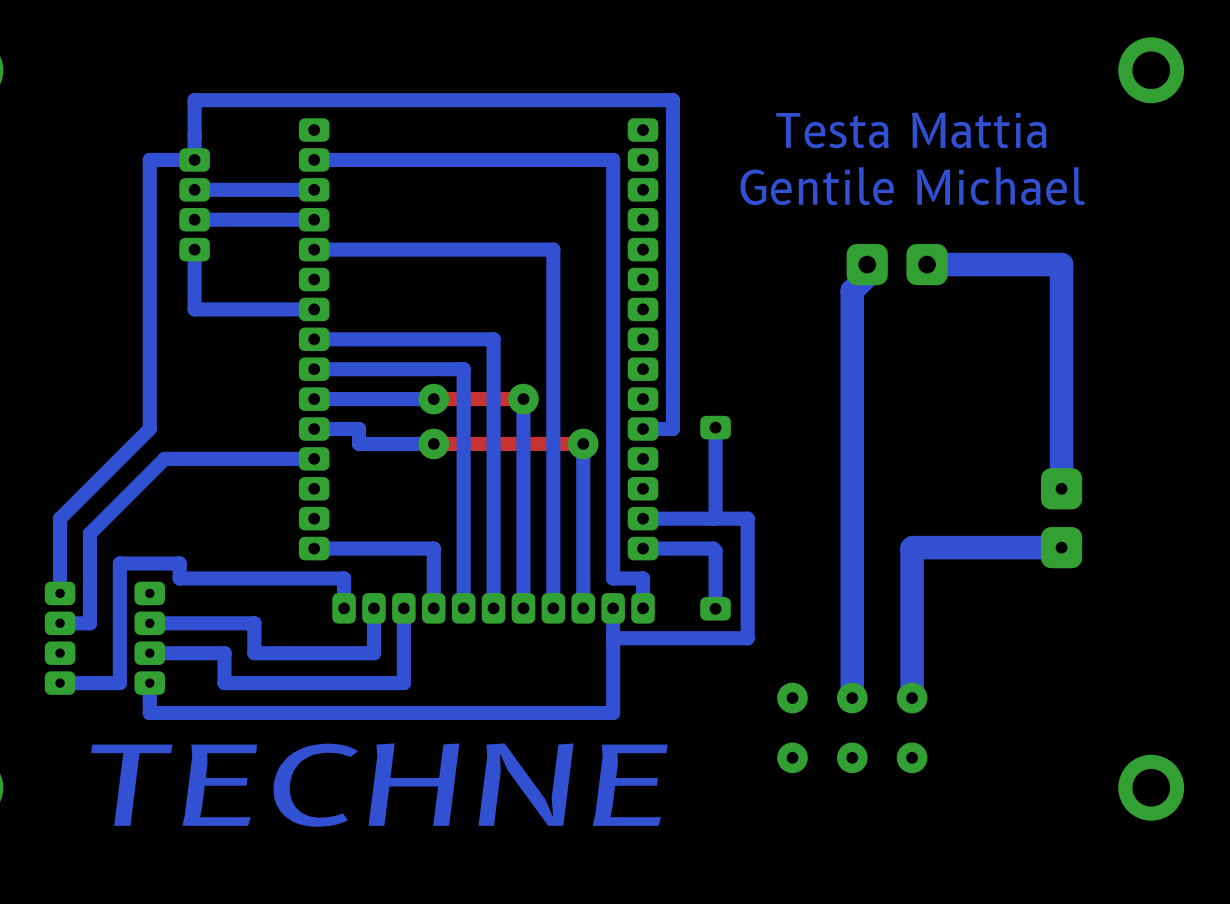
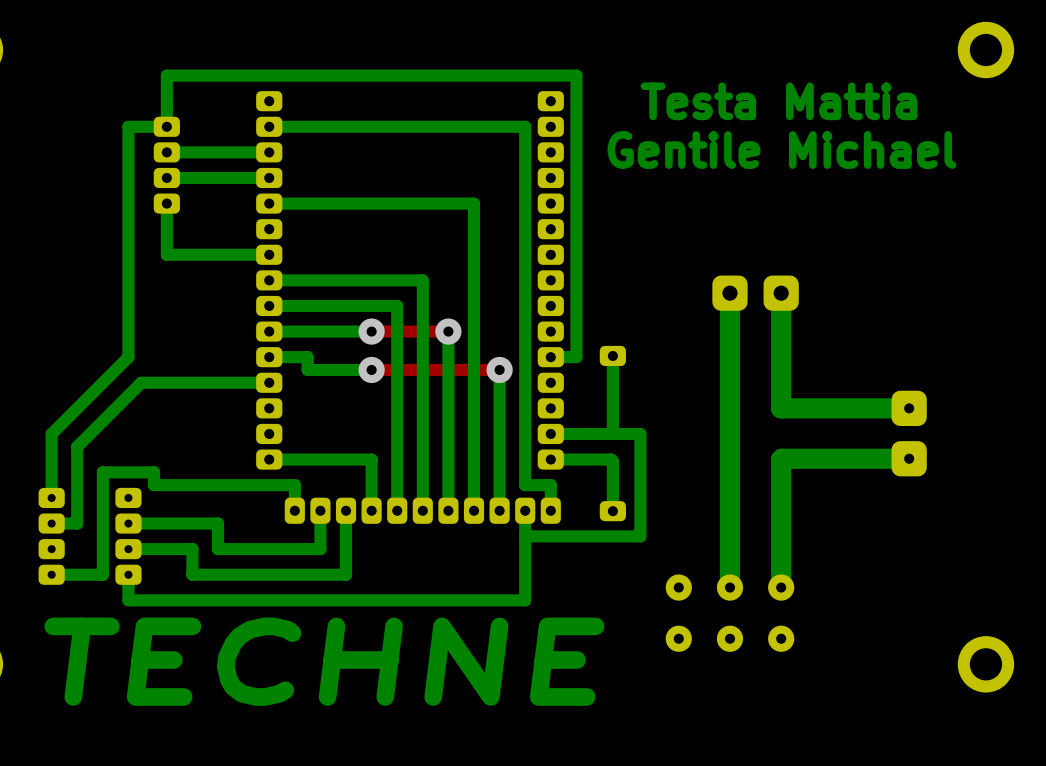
bottom track: (867, 264) (867, 275) (852, 290) (852, 354) -> none
part position: (897, 264) -> (755, 293)
bottom track: (927, 264) (1061, 264) (1061, 488) -> (781, 293) (781, 408) (909, 408)

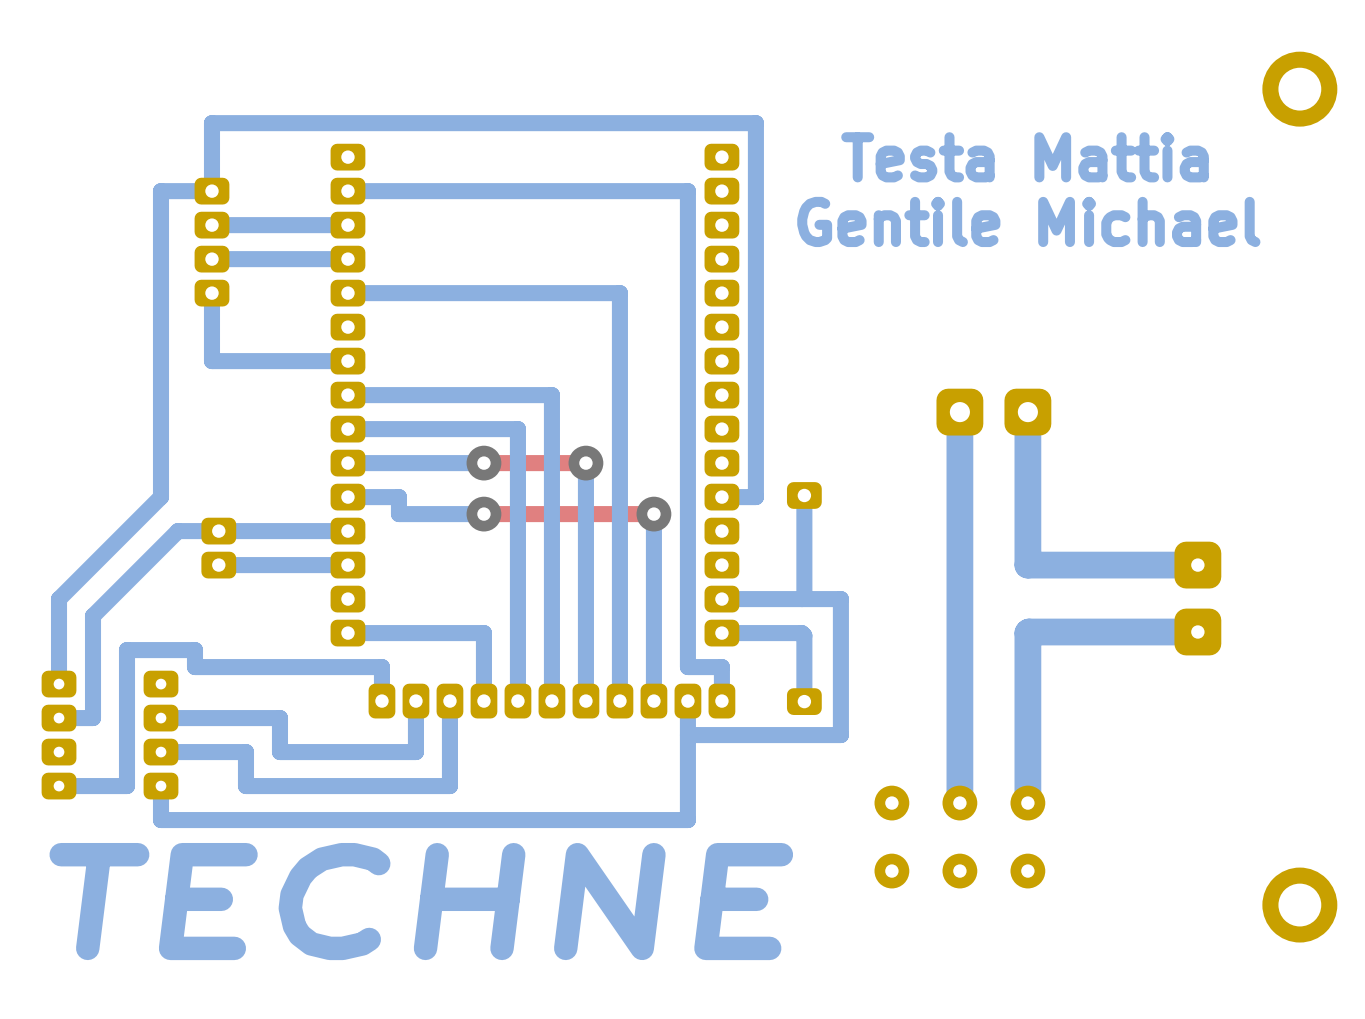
part: none -> (218, 548)
bottom track: none -> (347, 565) (218, 565)

